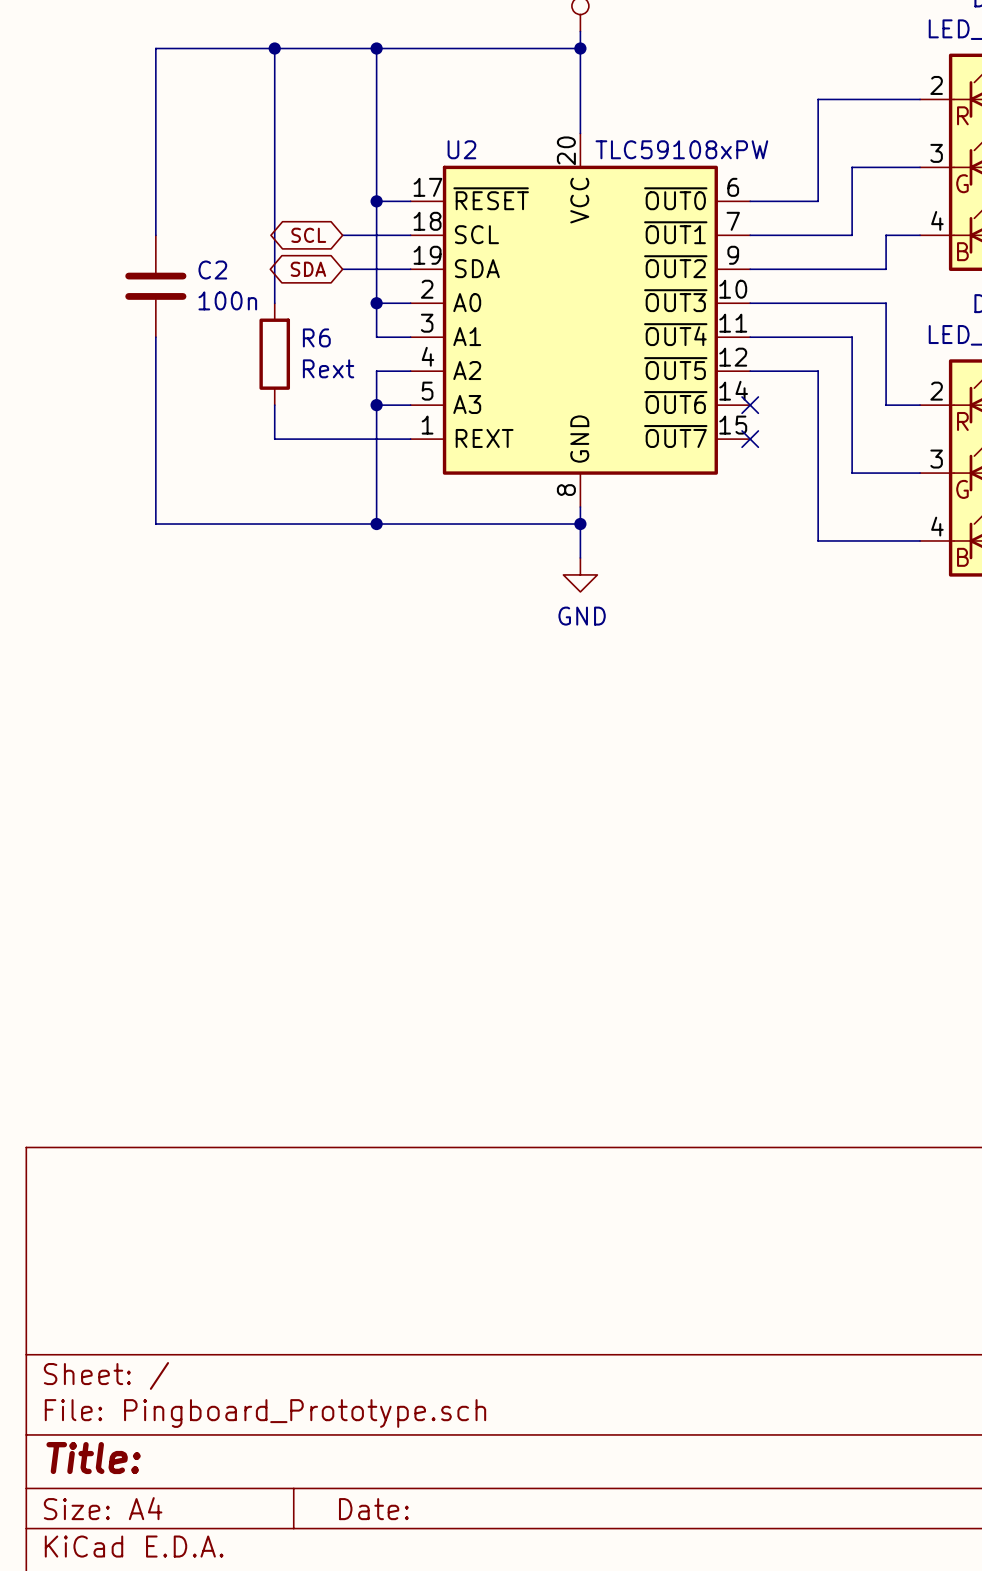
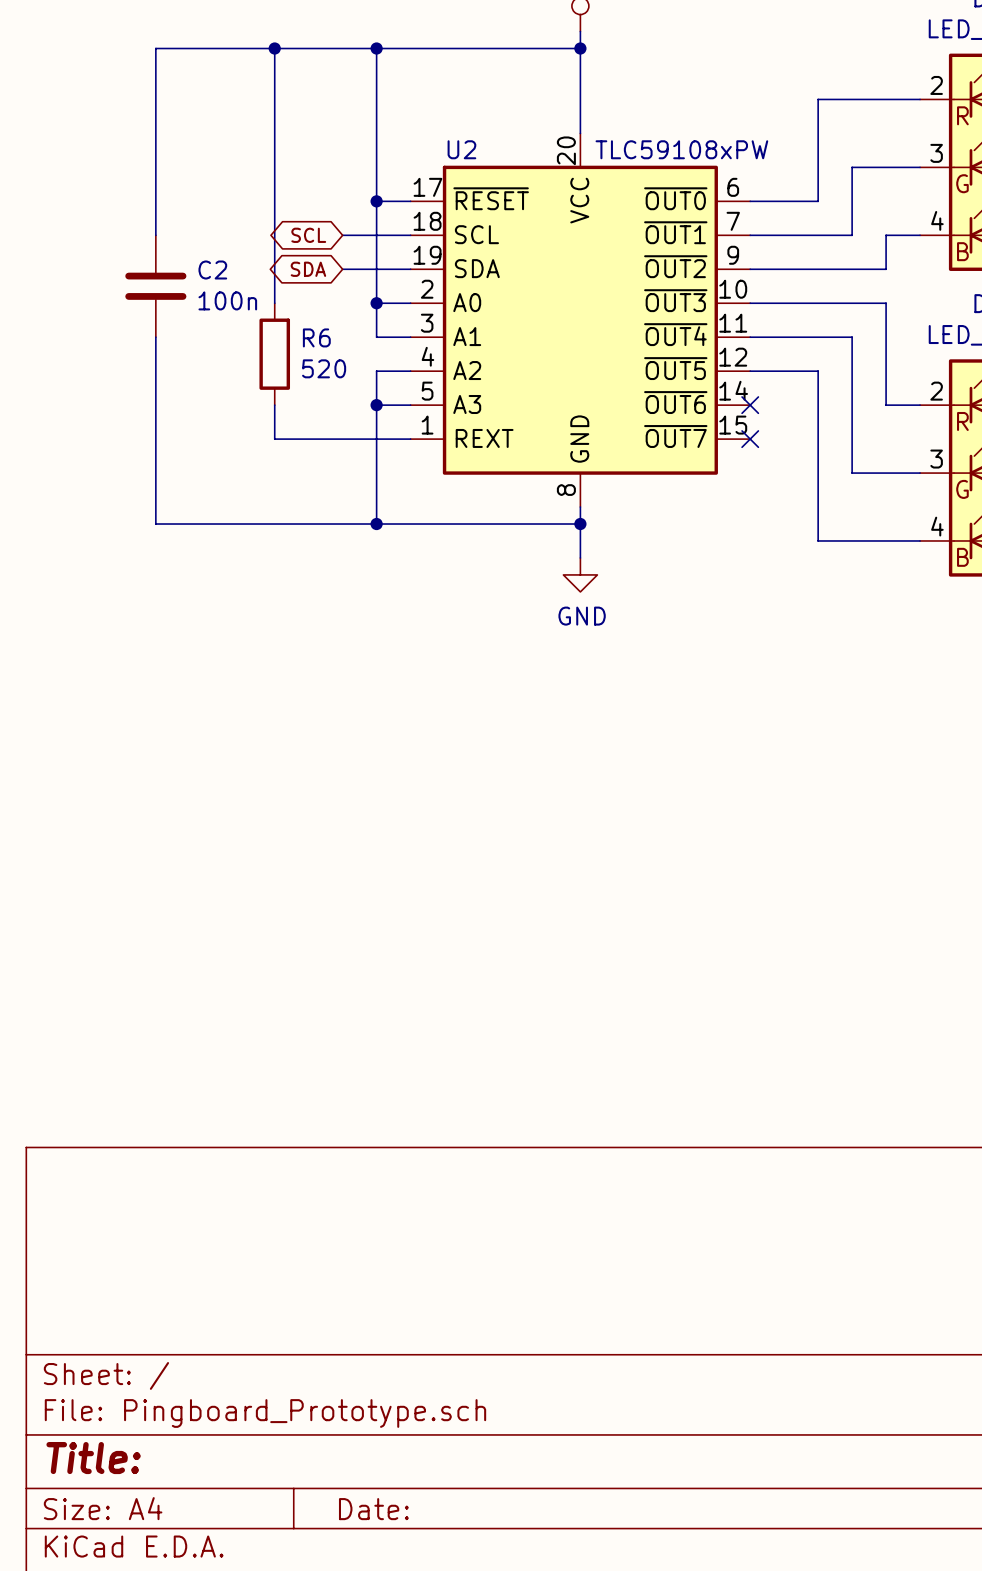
R6 value: Rext (328, 368) -> 520 (324, 368)

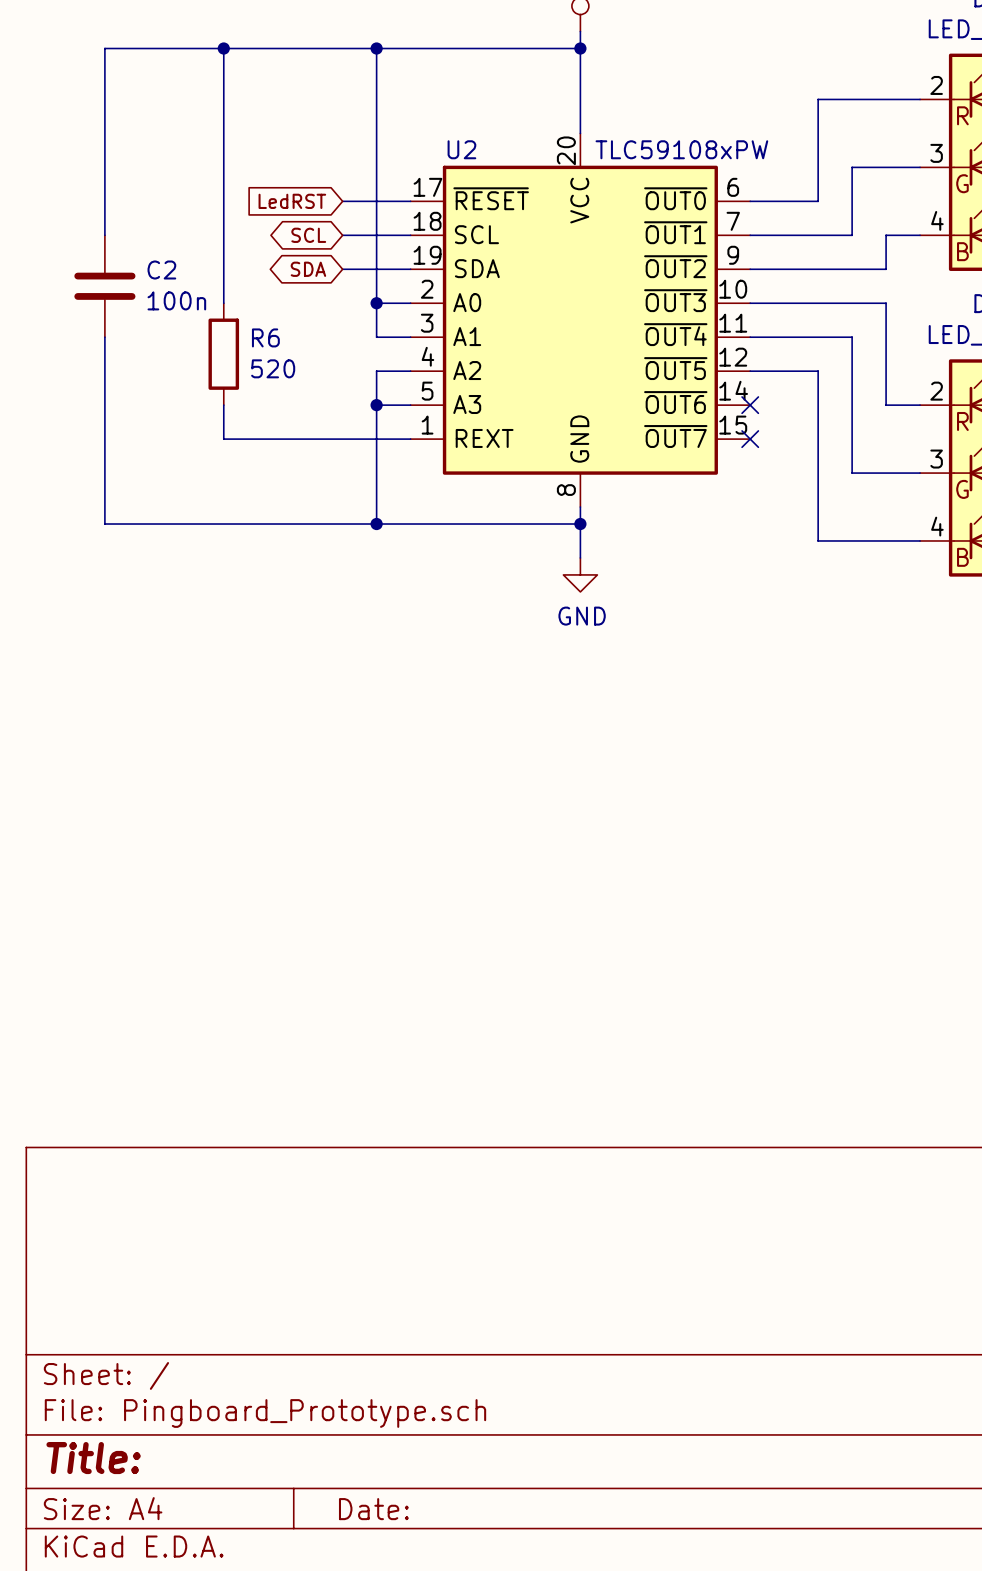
wire: (155, 48) (155, 235) -> (155, 48) (104, 48) (104, 235)
wire: (274, 48) (274, 303) -> (223, 48) (223, 303)
junction position: (274, 48) -> (223, 48)
global label: none -> LedRST (292, 201)
wire: none -> (342, 201) (376, 201)
junction: (376, 201) -> none
C2 position: (155, 286) -> (104, 286)
wire: (155, 337) (155, 524) -> (104, 337) (104, 524) (155, 524)
R6 position: (274, 354) -> (223, 354)
wire: (274, 405) (274, 439) -> (223, 405) (223, 439) (274, 439)

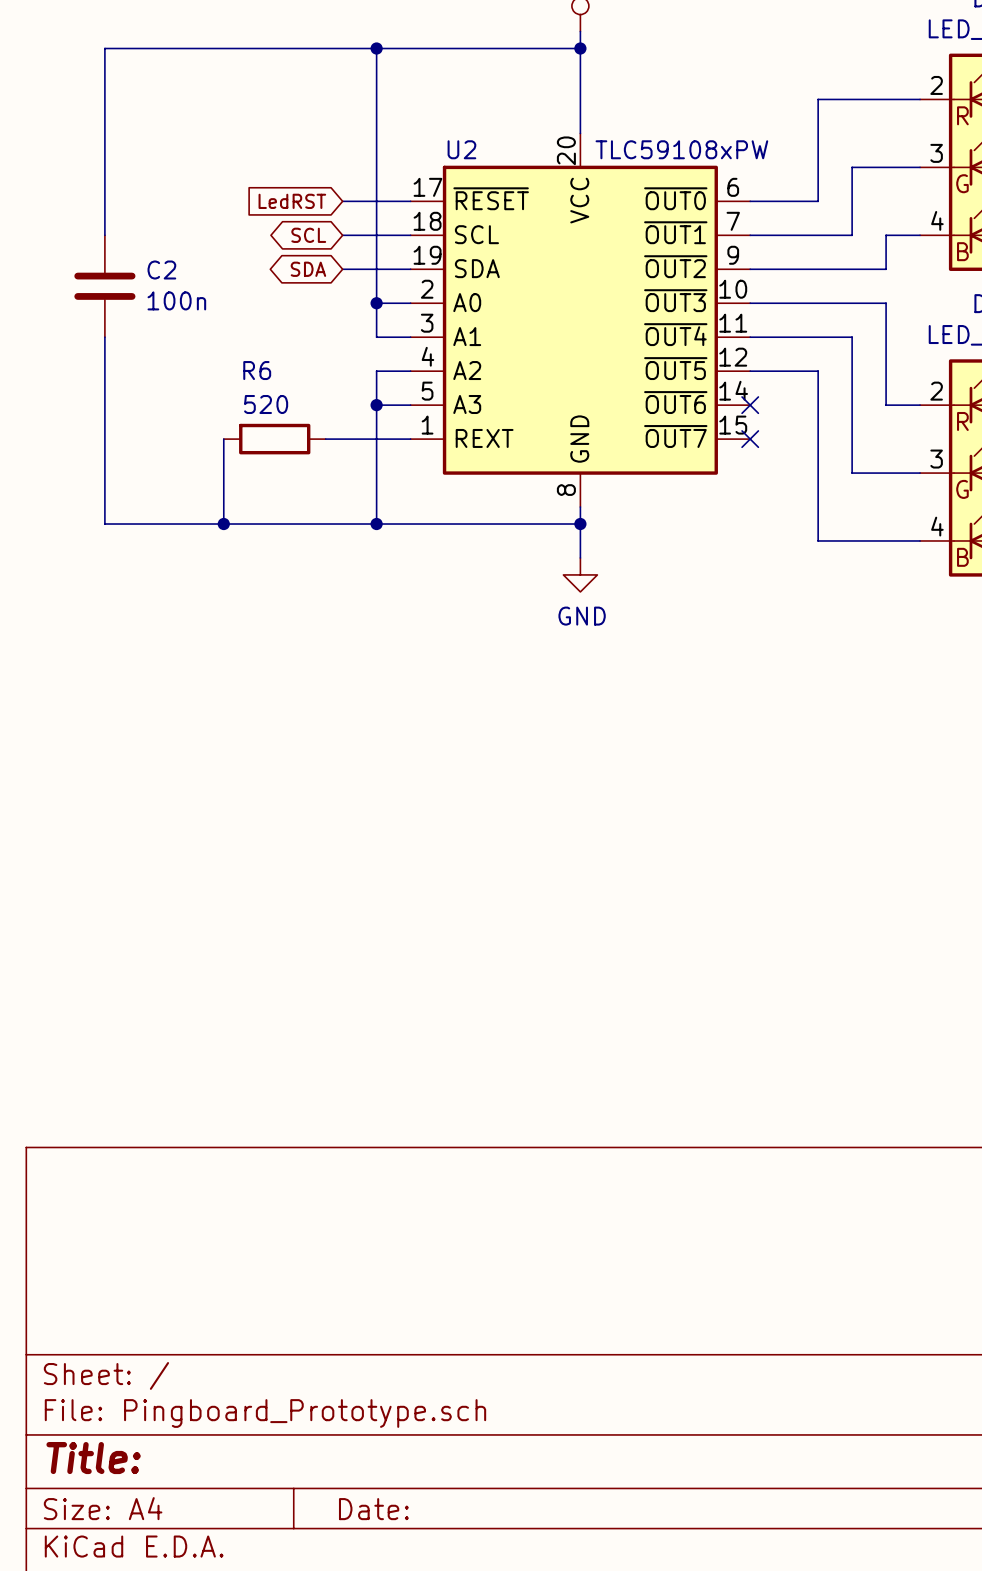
wire: (223, 48) (223, 303) -> none
junction: (223, 48) -> none
R6 name position: R6 (265, 337) -> R6 (257, 370)
R6 rotation: 0° (223, 354) -> 90° clockwise (274, 439)
R6 position: (223, 354) -> (274, 439)
R6 value position: 520 (273, 368) -> 520 (266, 404)
wire: (223, 405) (223, 439) (325, 439) -> none
wire: none -> (223, 439) (223, 524)
junction: none -> (223, 524)

